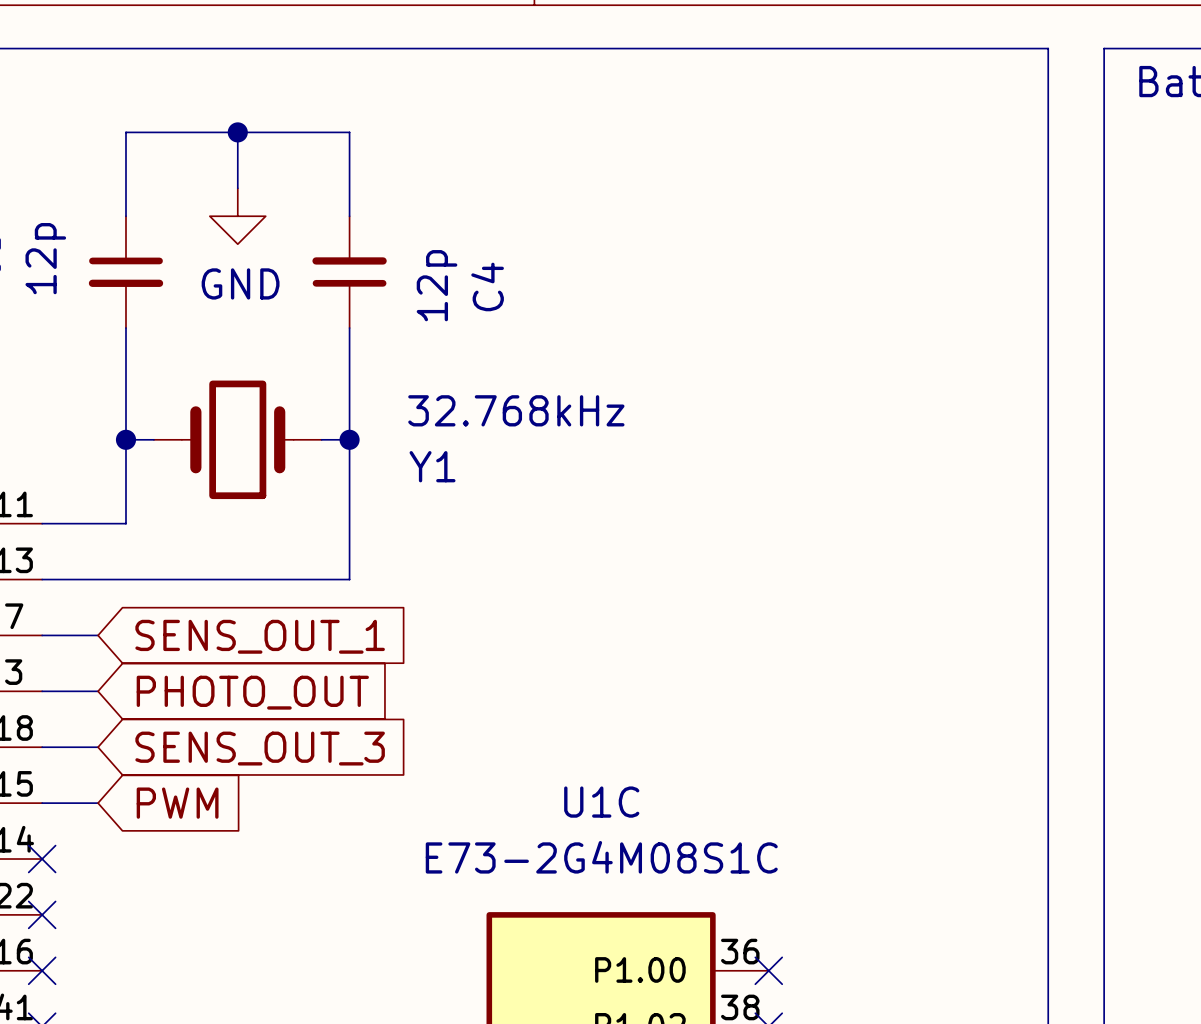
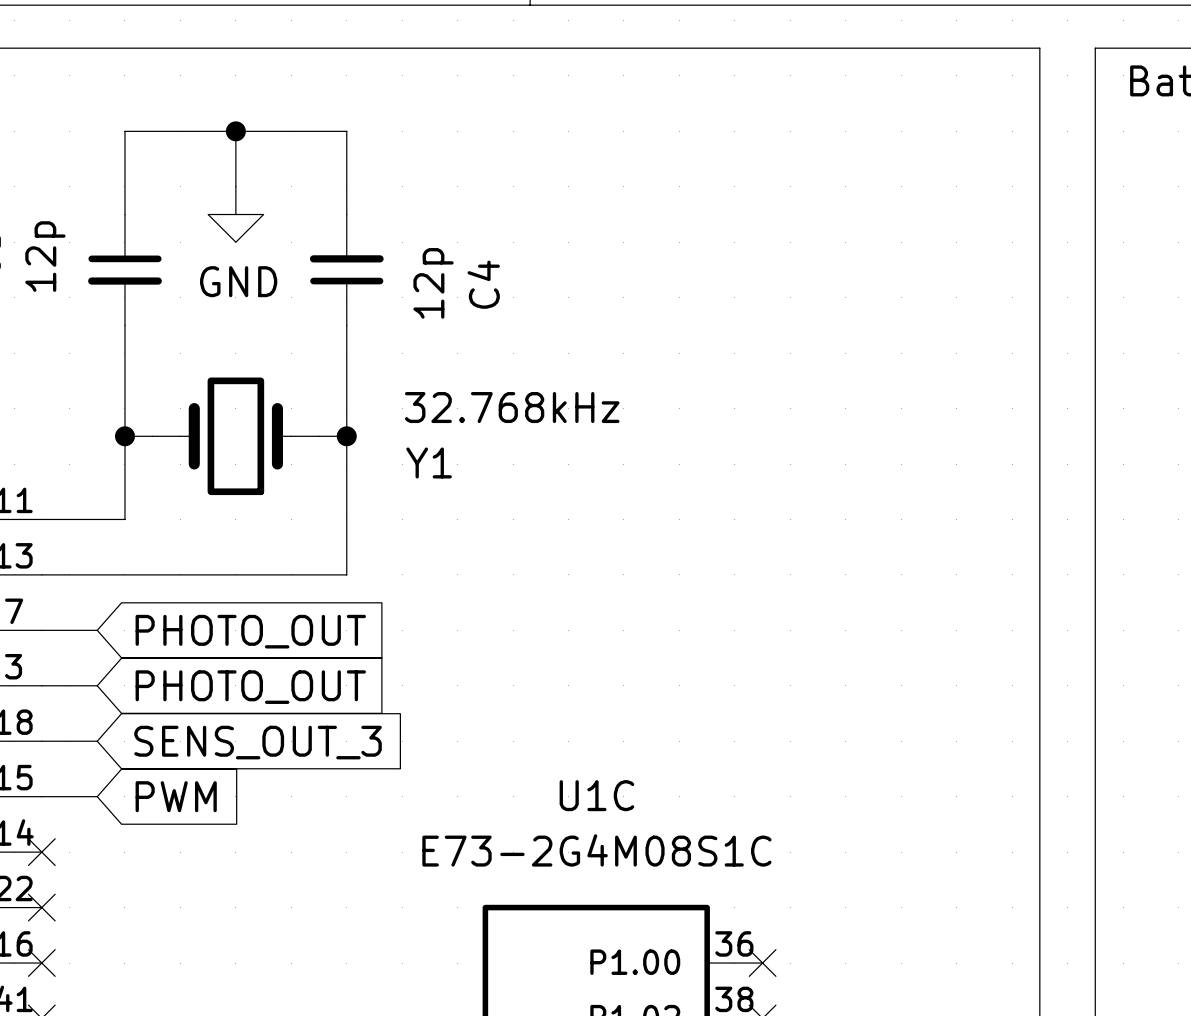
global label: SENS_OUT_1 (260, 636) -> PHOTO_OUT (250, 631)

